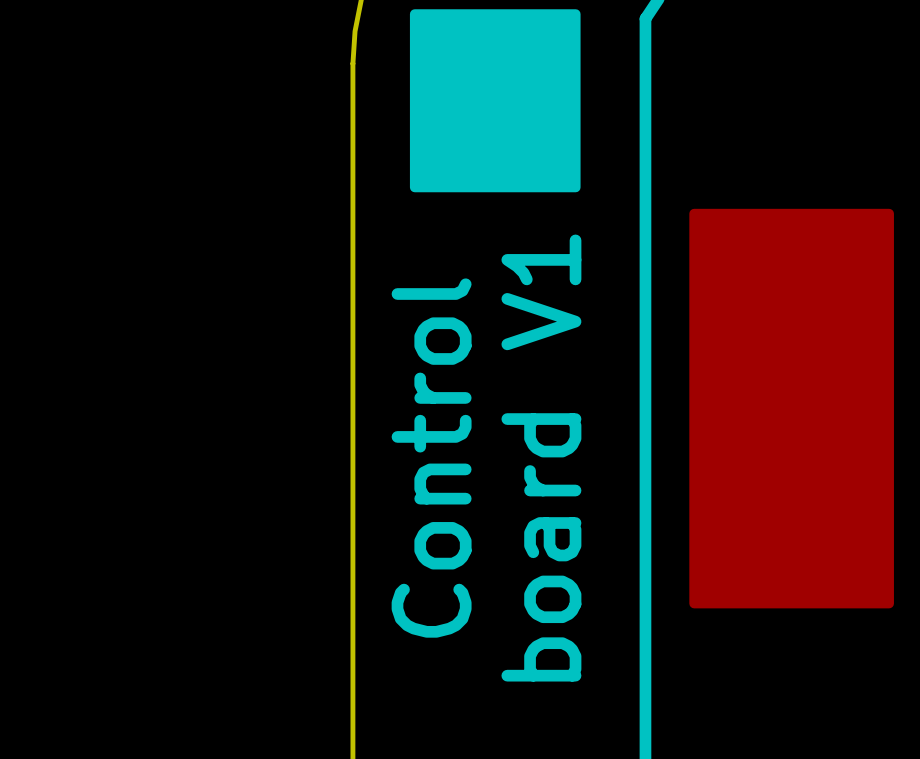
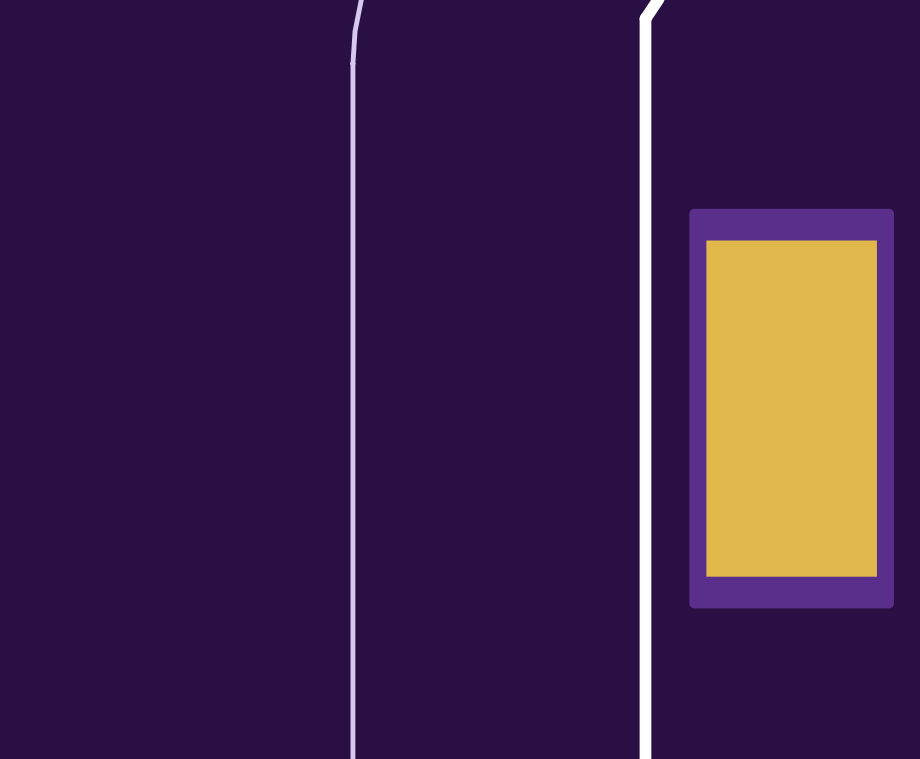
drawing: [409, 9, 581, 193] -> none
text: Control (431, 458) -> none
text: board V1 (541, 458) -> none

